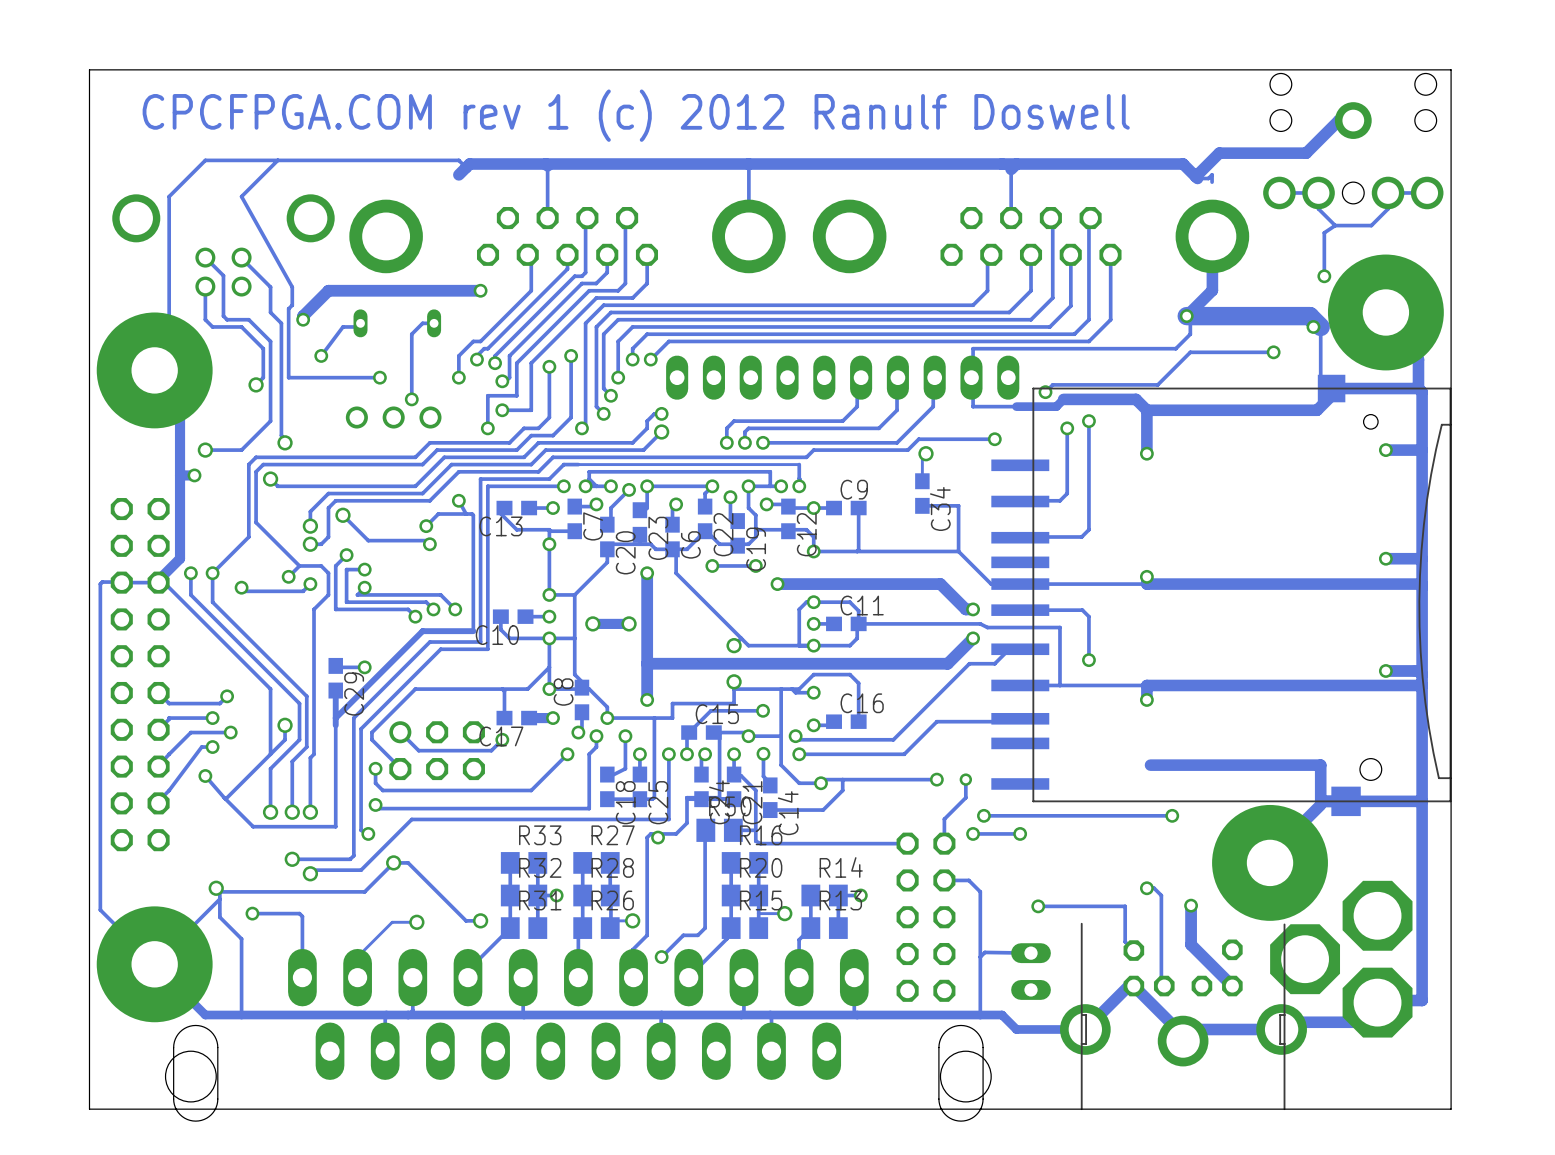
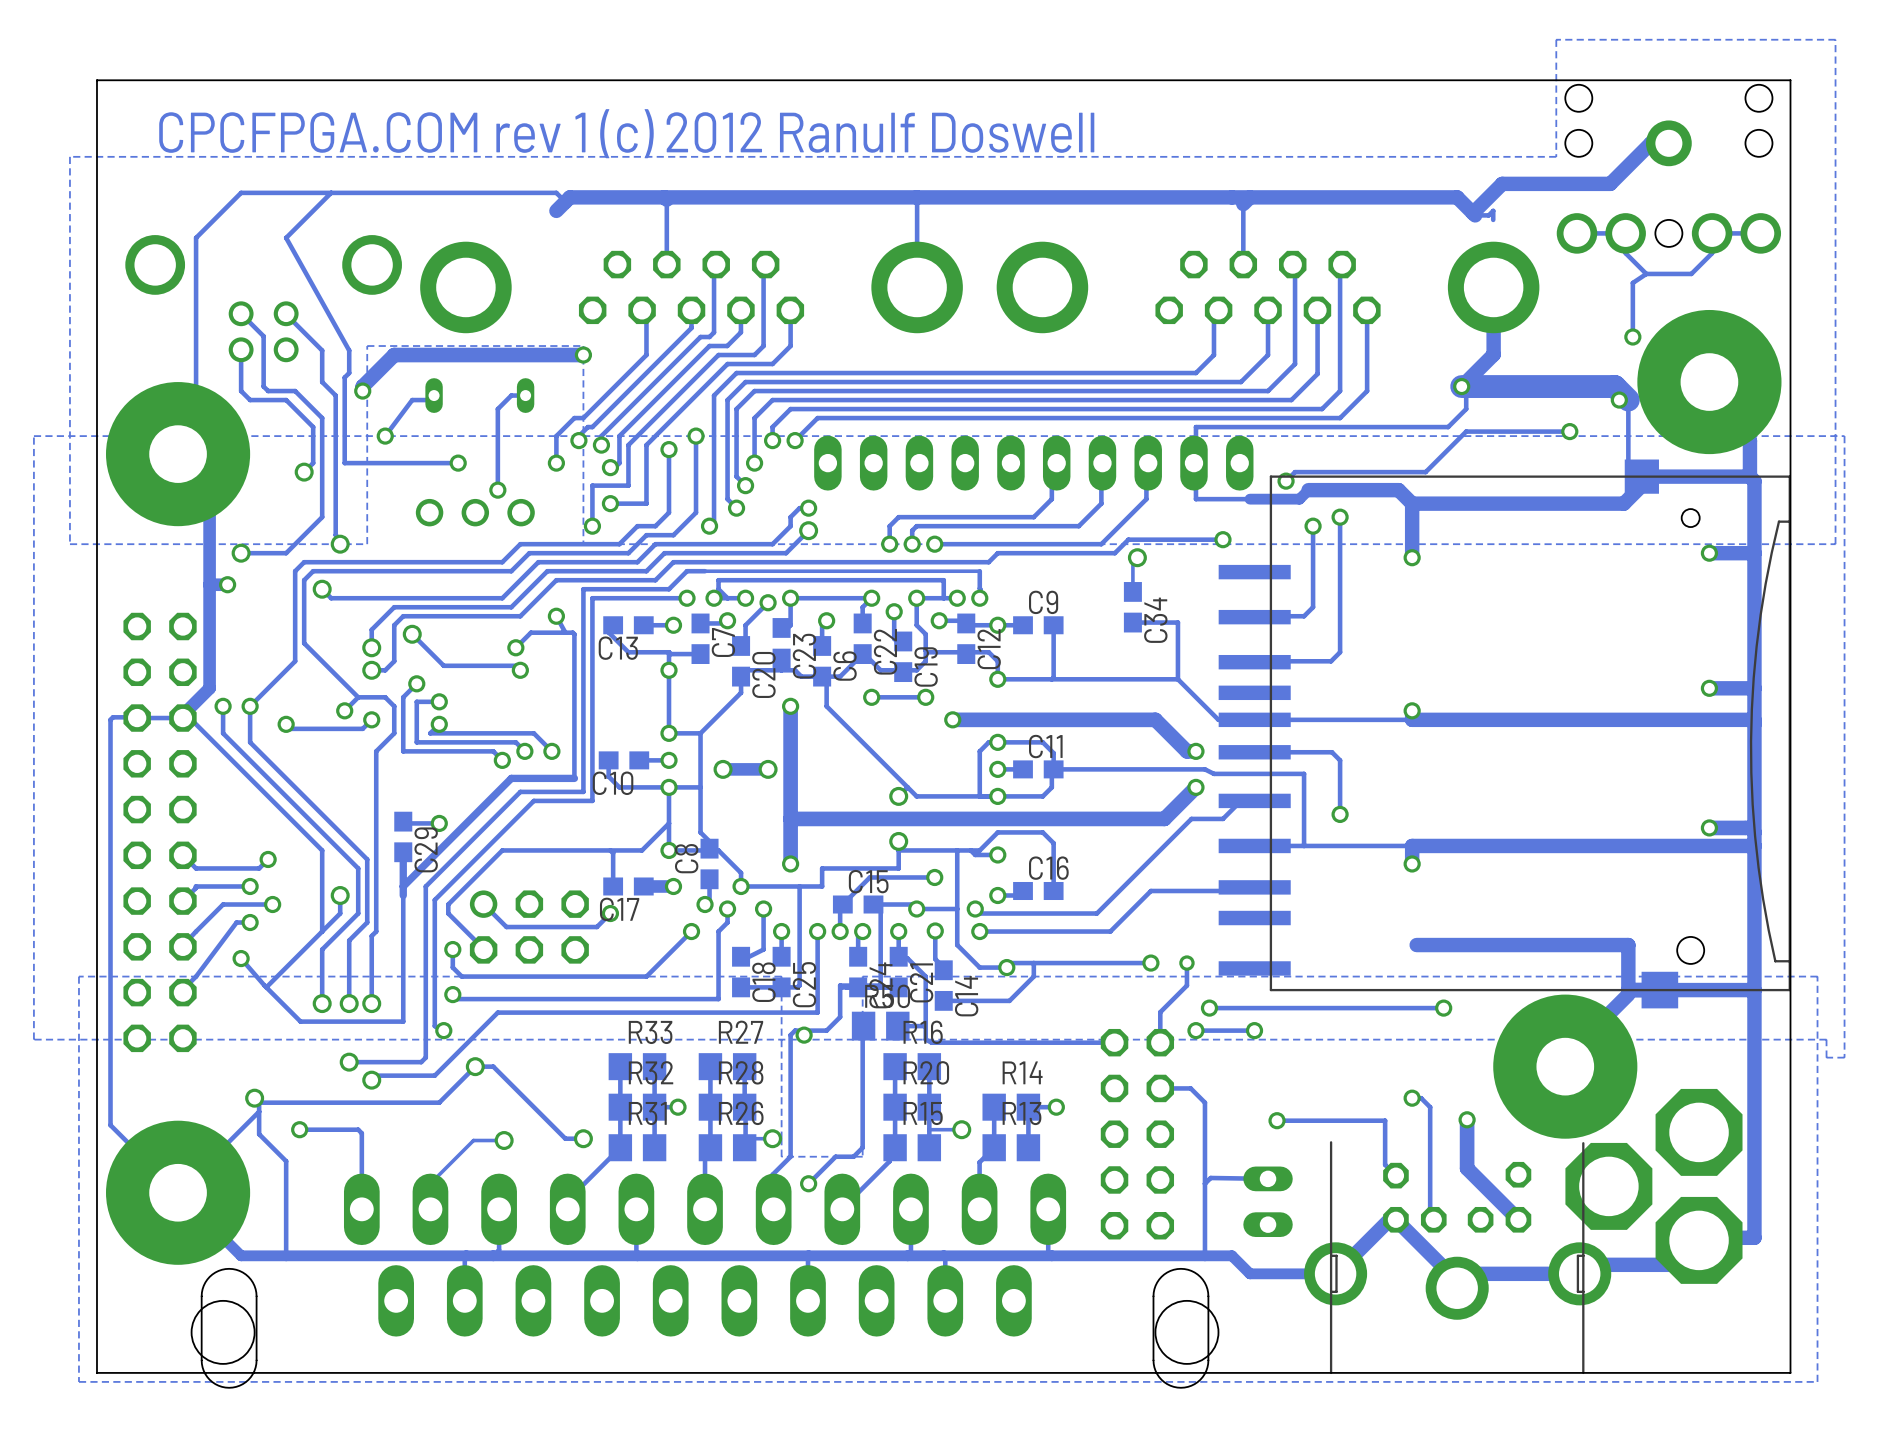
zone outline: none -> (1835, 39) (1556, 39) (1556, 156) (69, 156) (69, 544) (367, 544) (367, 346) (583, 346) (583, 544) (1835, 544) (1835, 39)
zone outline: none -> (1844, 436) (33, 436) (33, 1039) (1826, 1039) (1826, 1057) (1844, 1057) (1844, 436)
zone outline: none -> (1817, 976) (862, 976) (862, 1156) (781, 1156) (781, 976) (78, 976) (78, 1381) (1817, 1381) (1817, 976)

